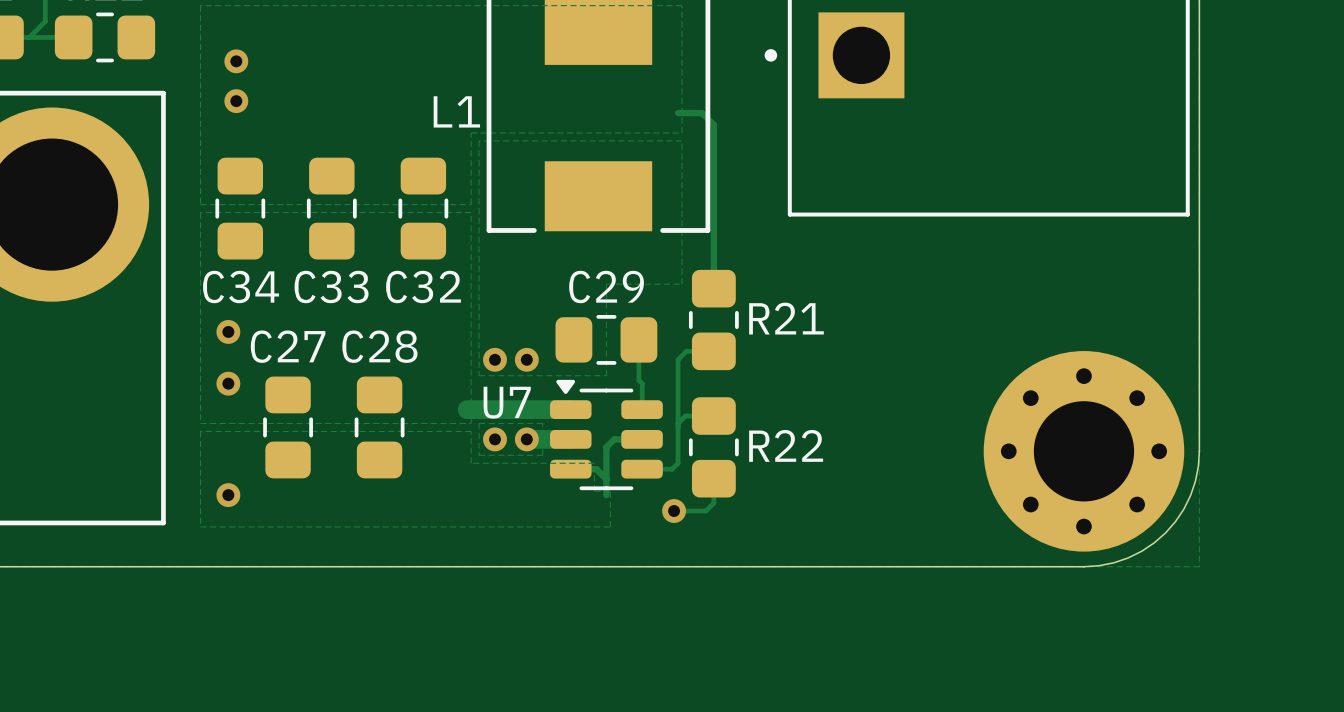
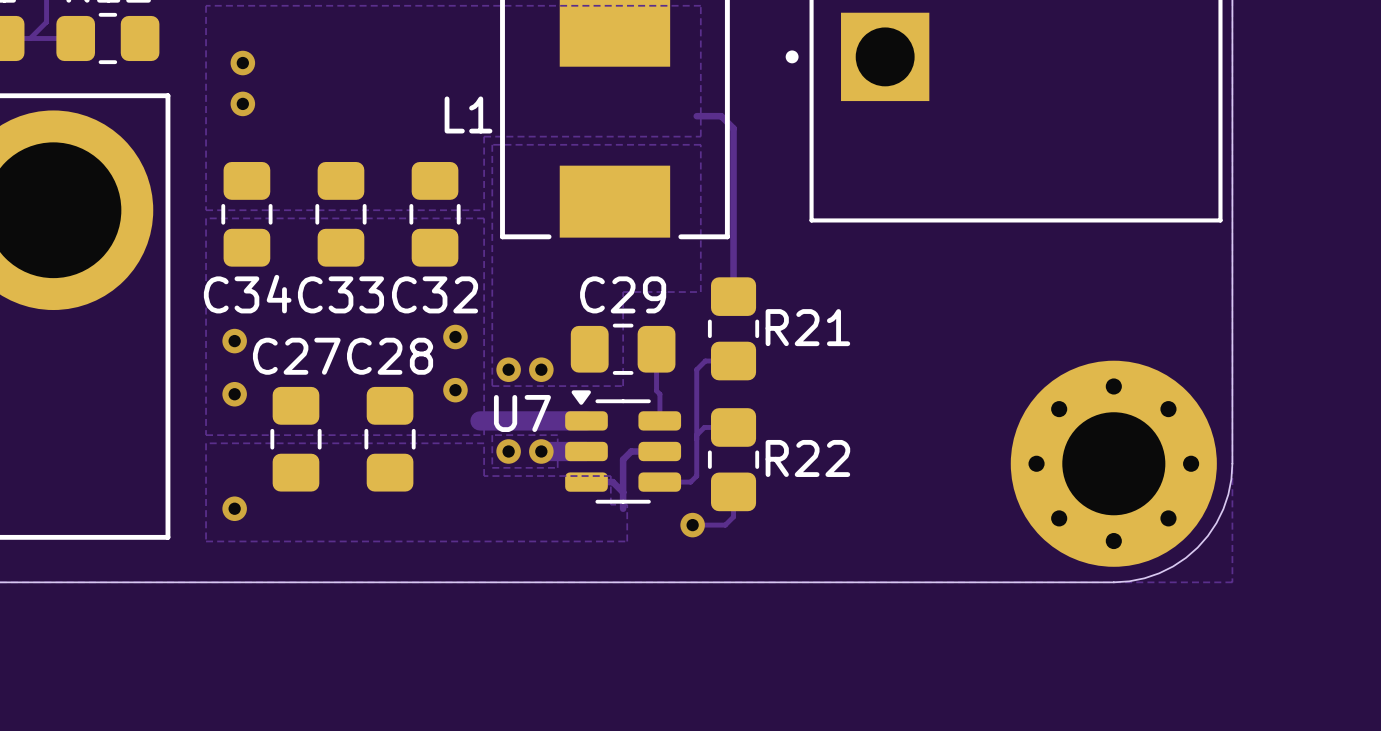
via: none -> (455, 337)
via: none -> (455, 390)

